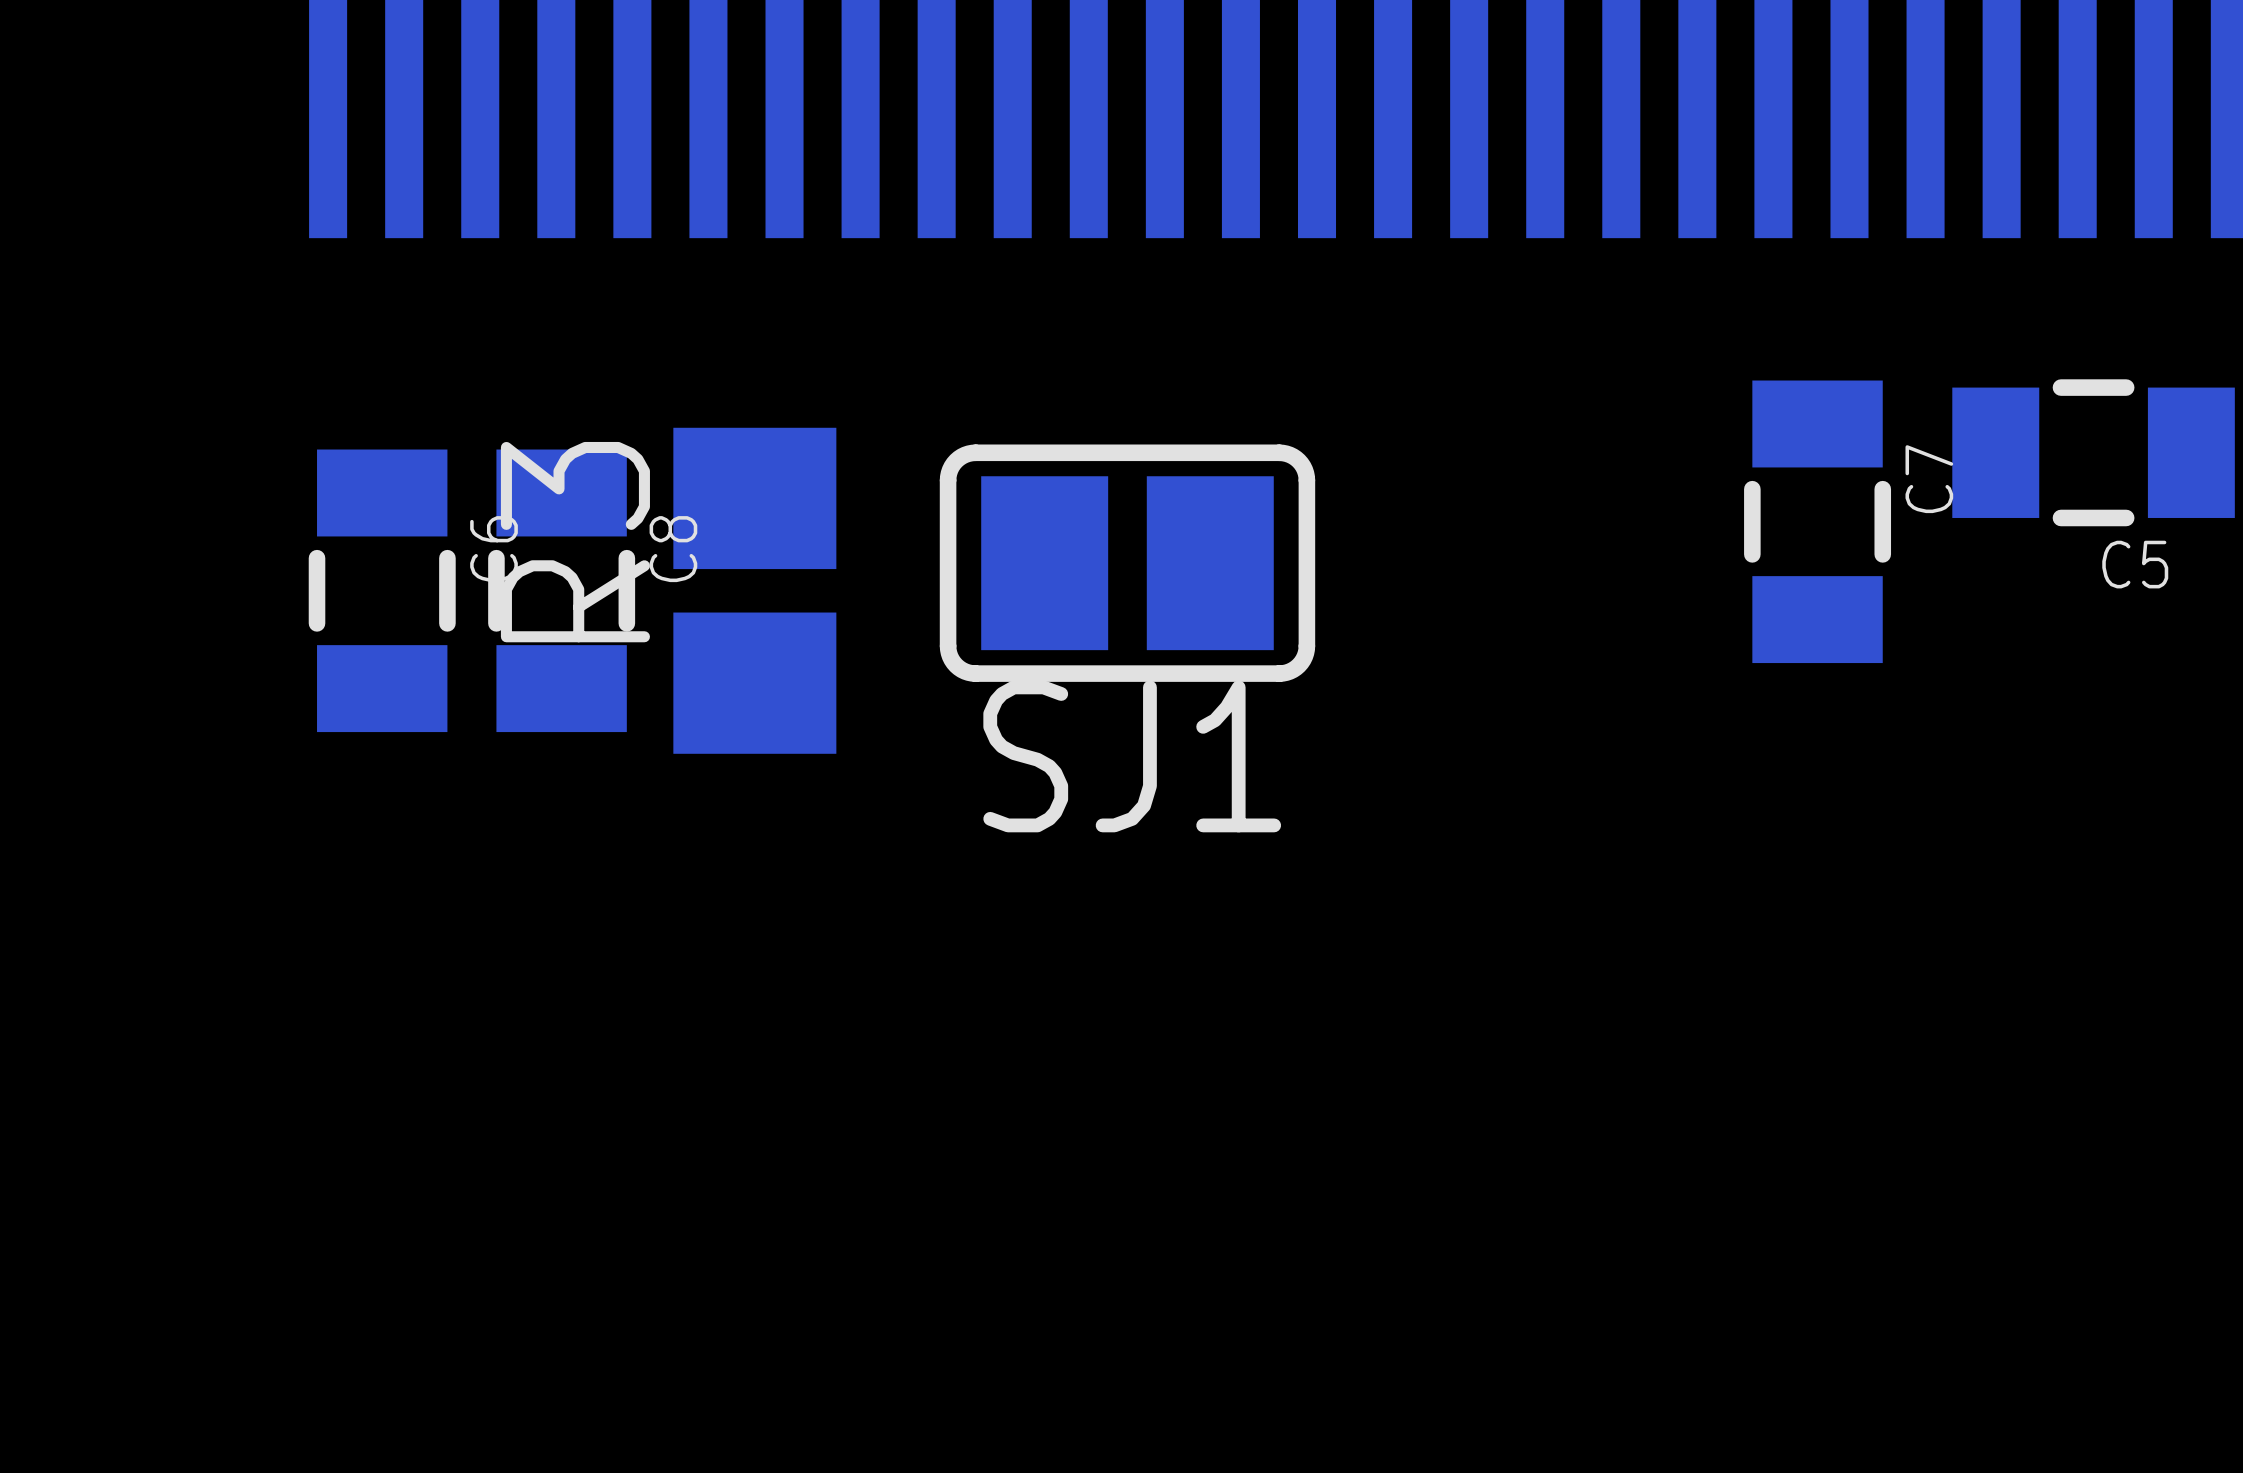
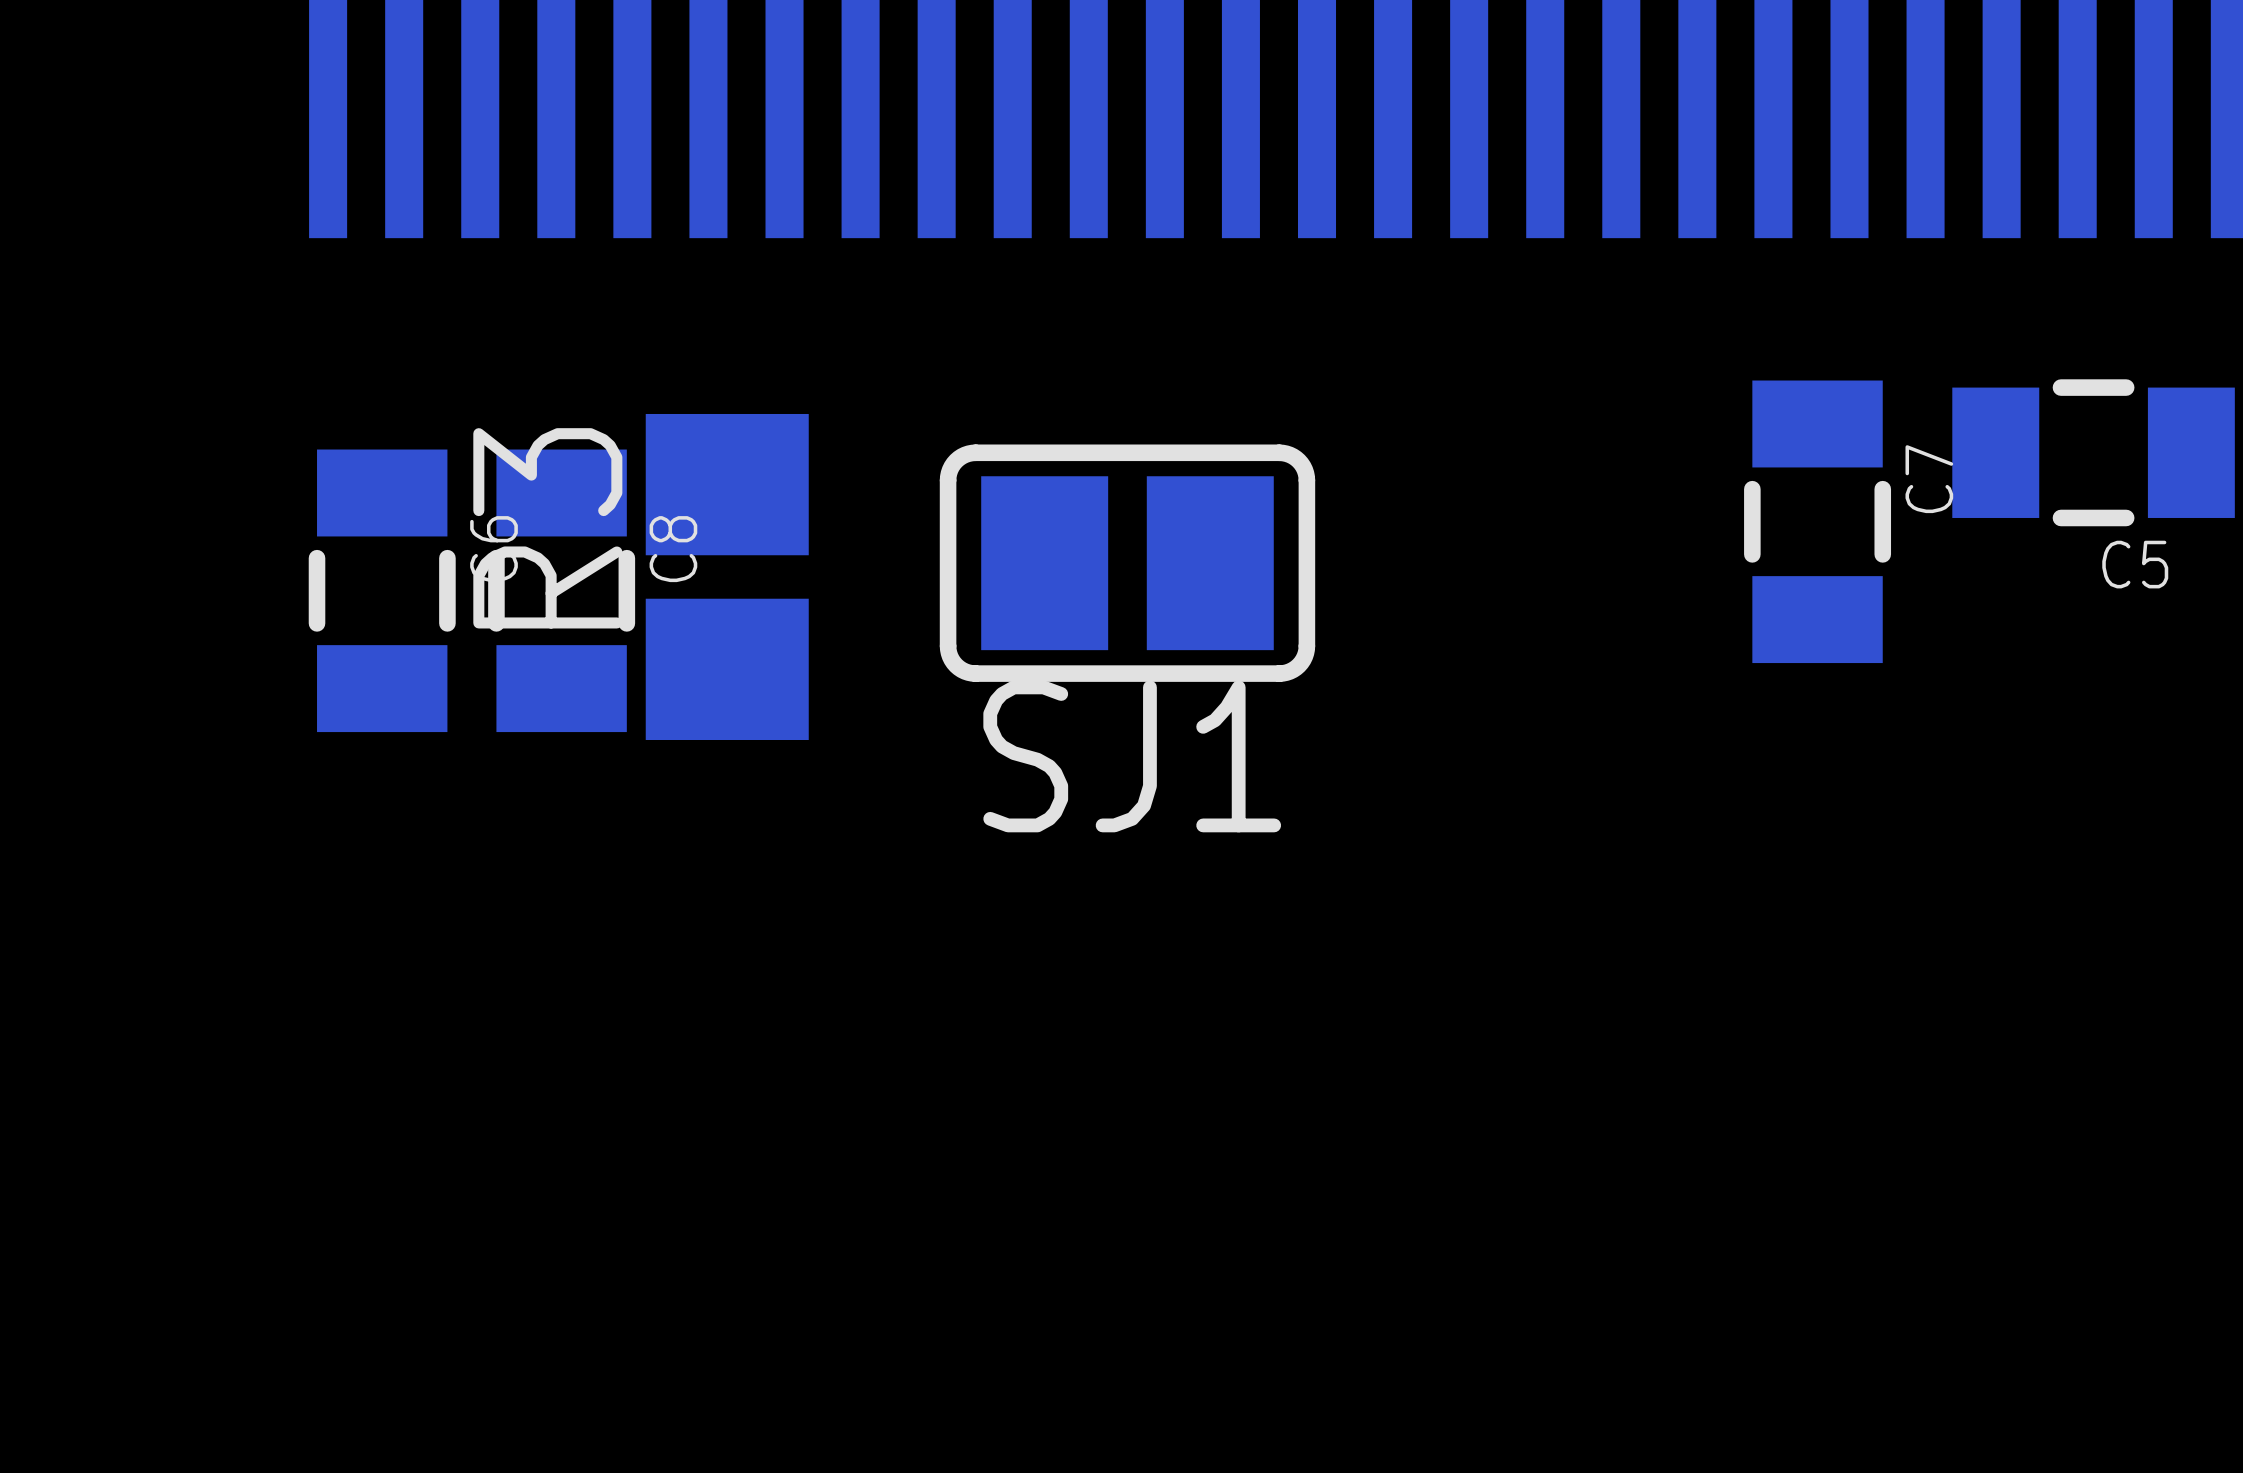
R3 position: (754, 590) -> (727, 576)

